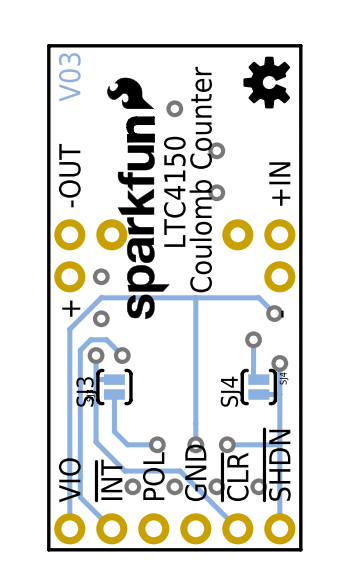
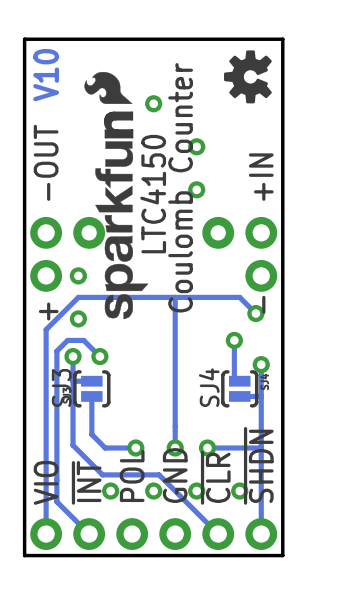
text: V03 (69, 77) -> V10 (46, 75)

